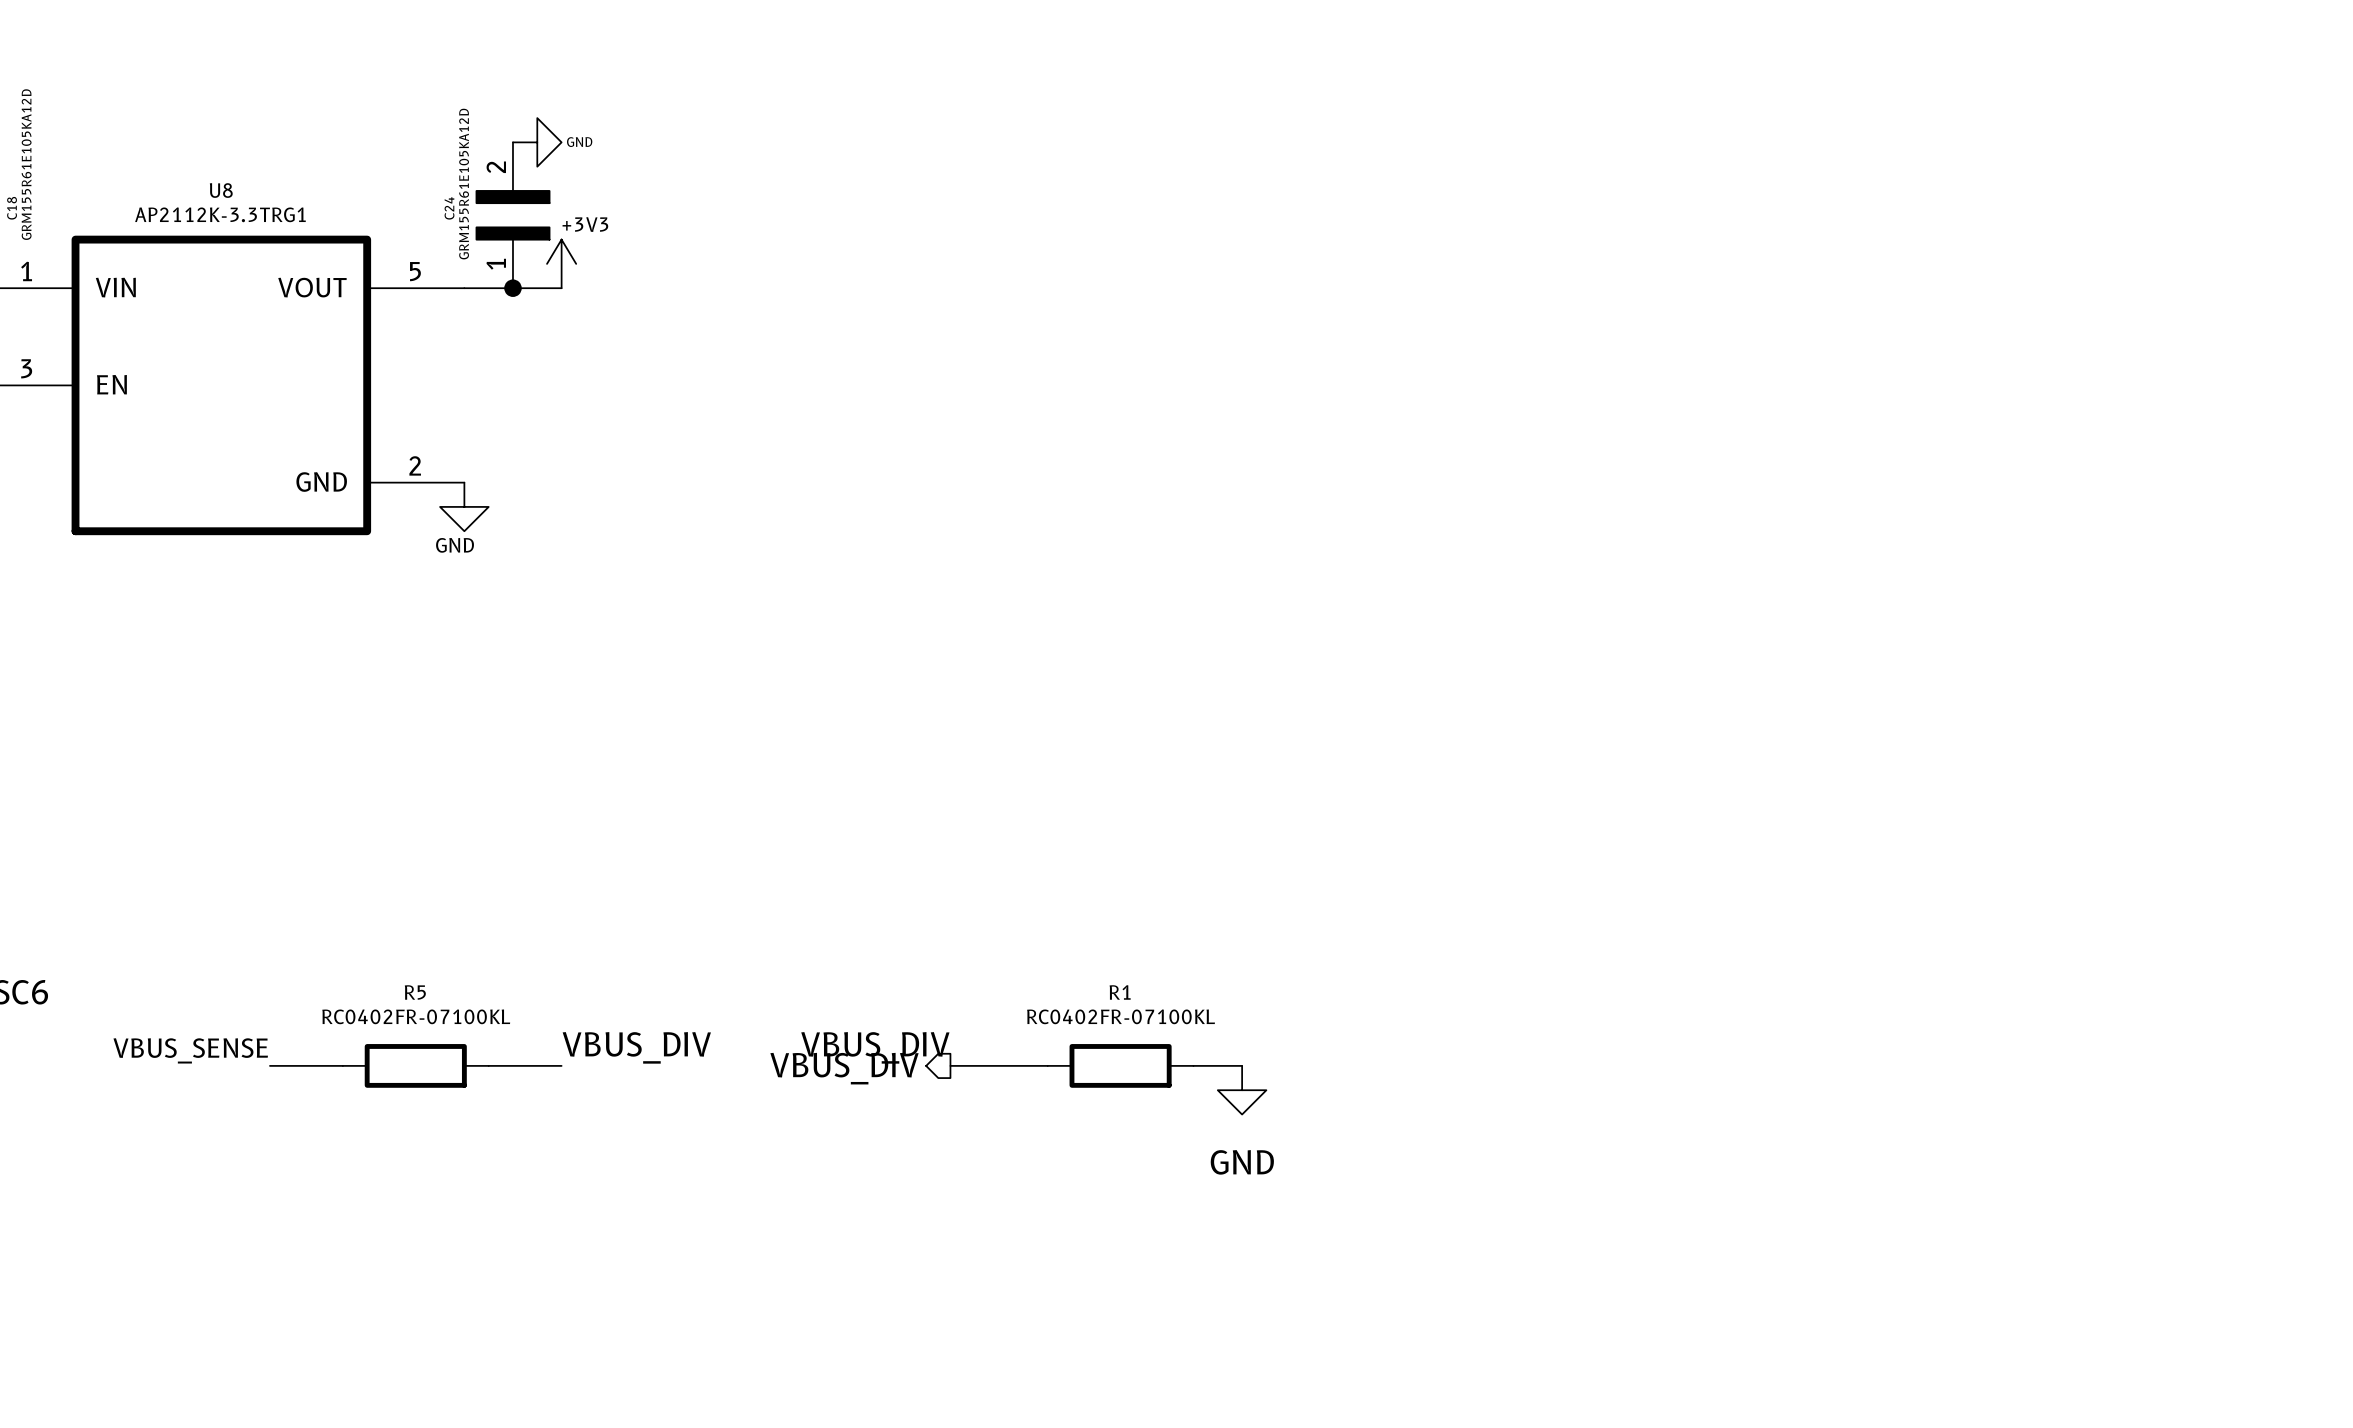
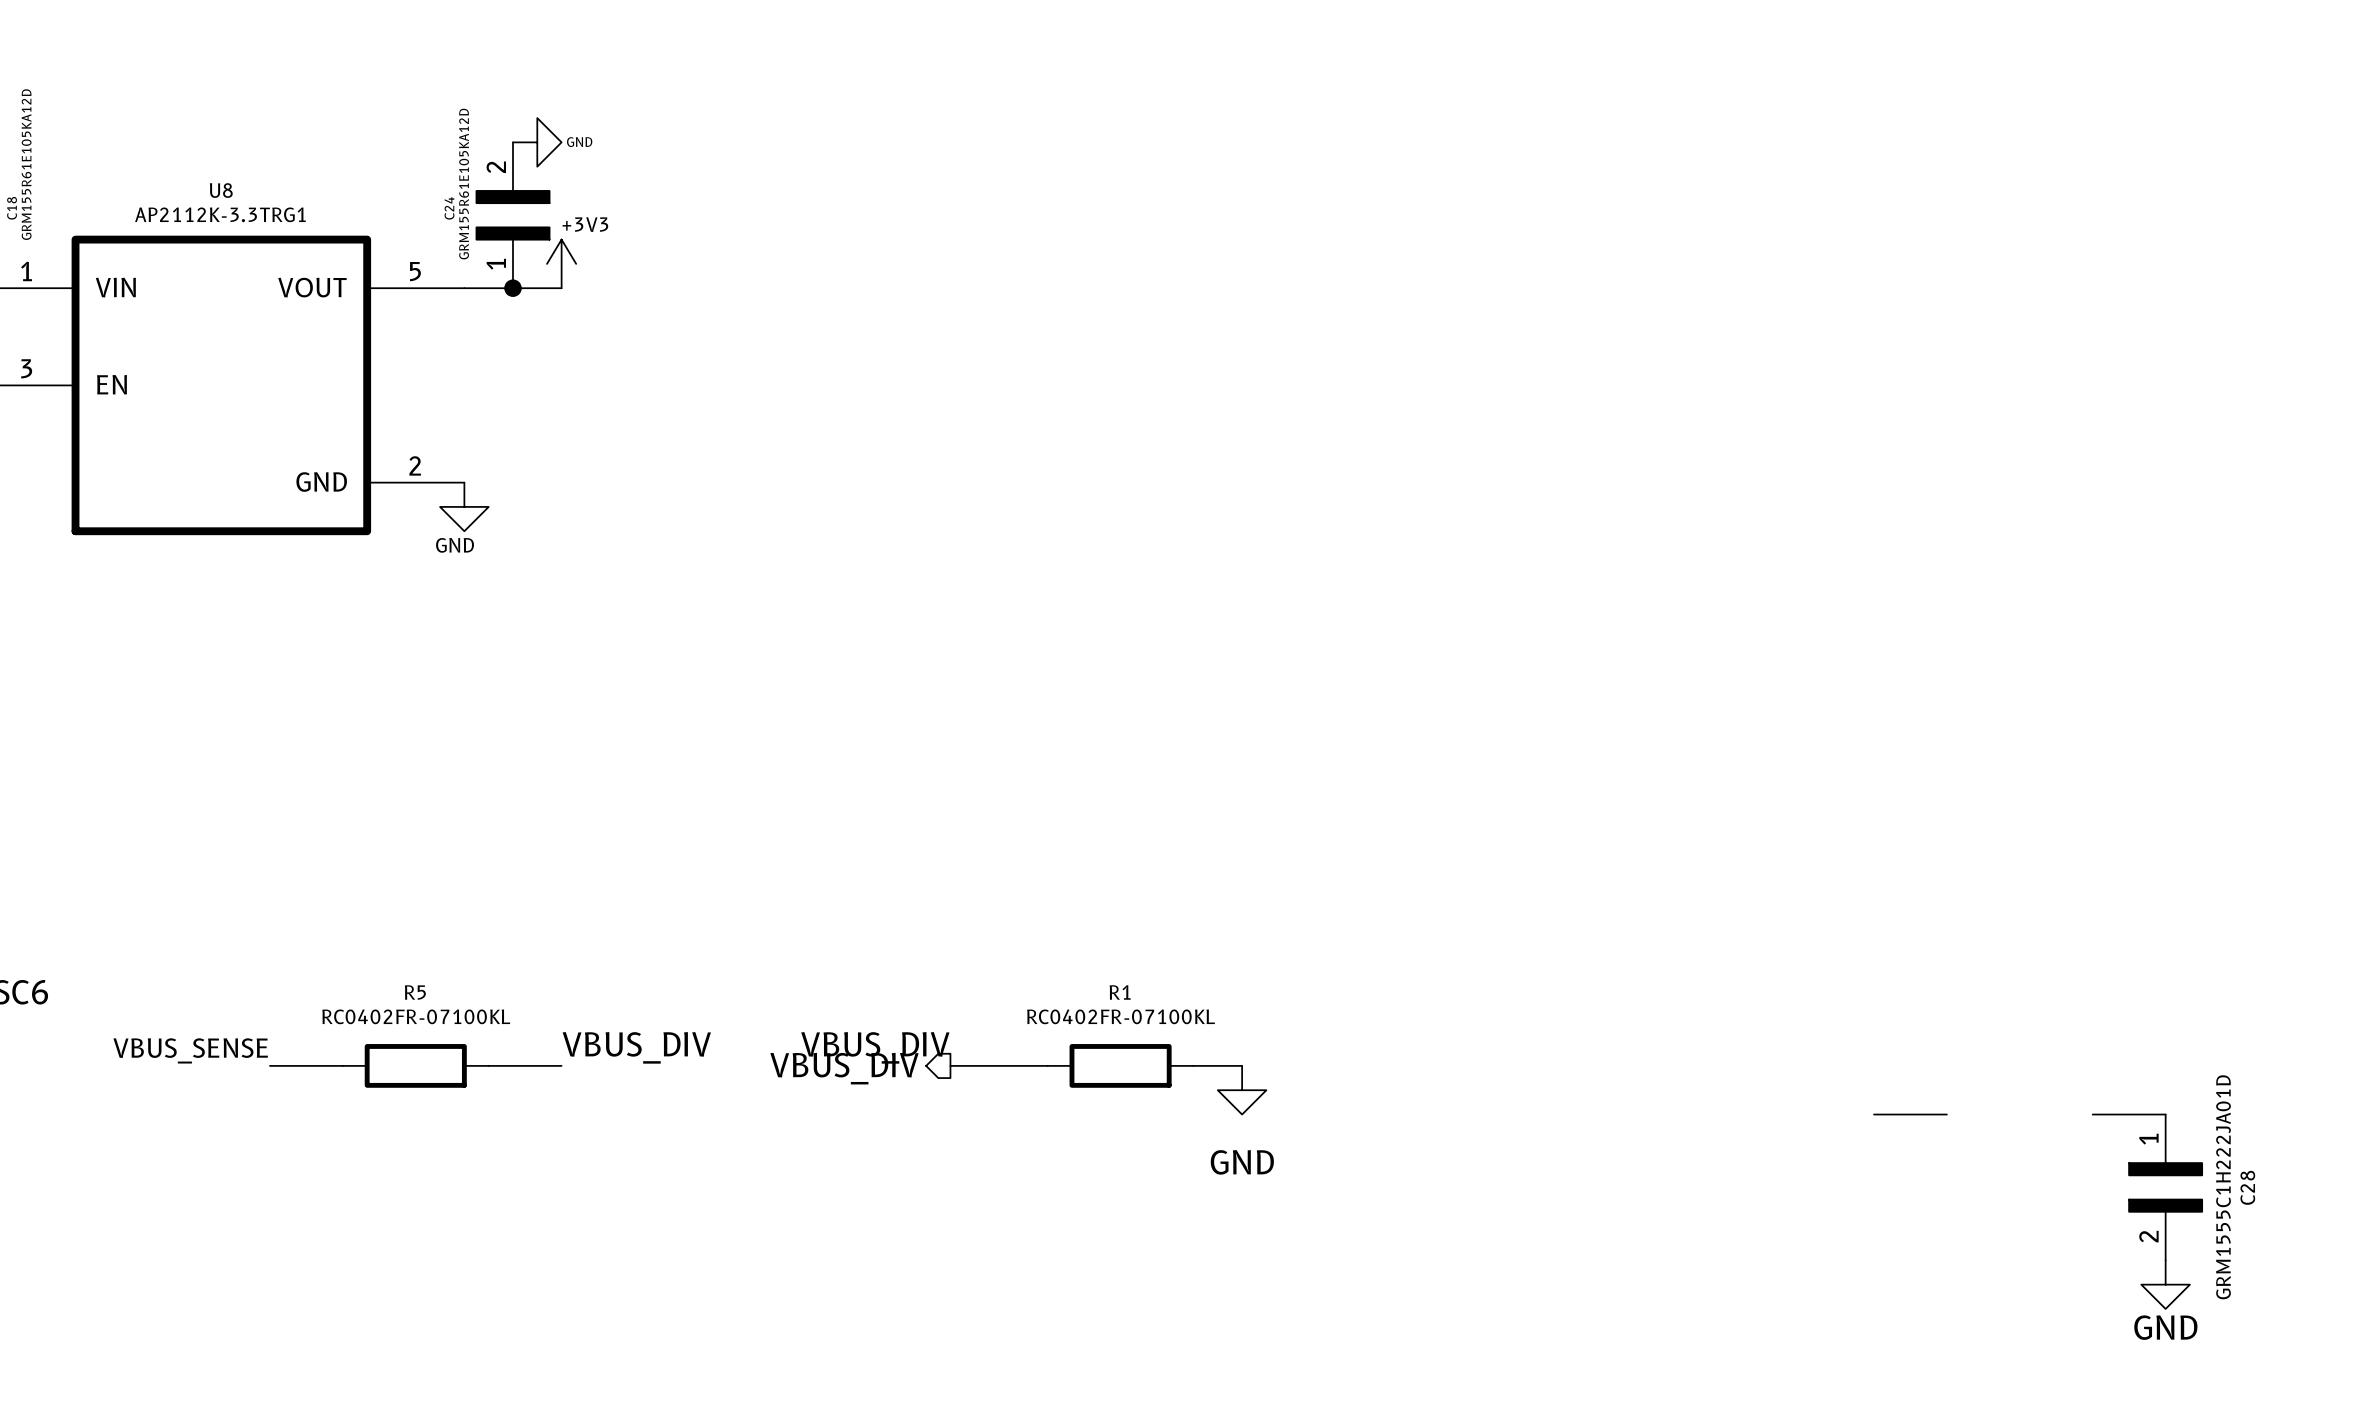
wire: none -> (1873, 1114) (1946, 1114)
wire: none -> (2092, 1114) (2165, 1114)
C28: none -> GRM1555C1H222JA01D (2165, 1187)
power symbol: none -> GND (2165, 1284)

